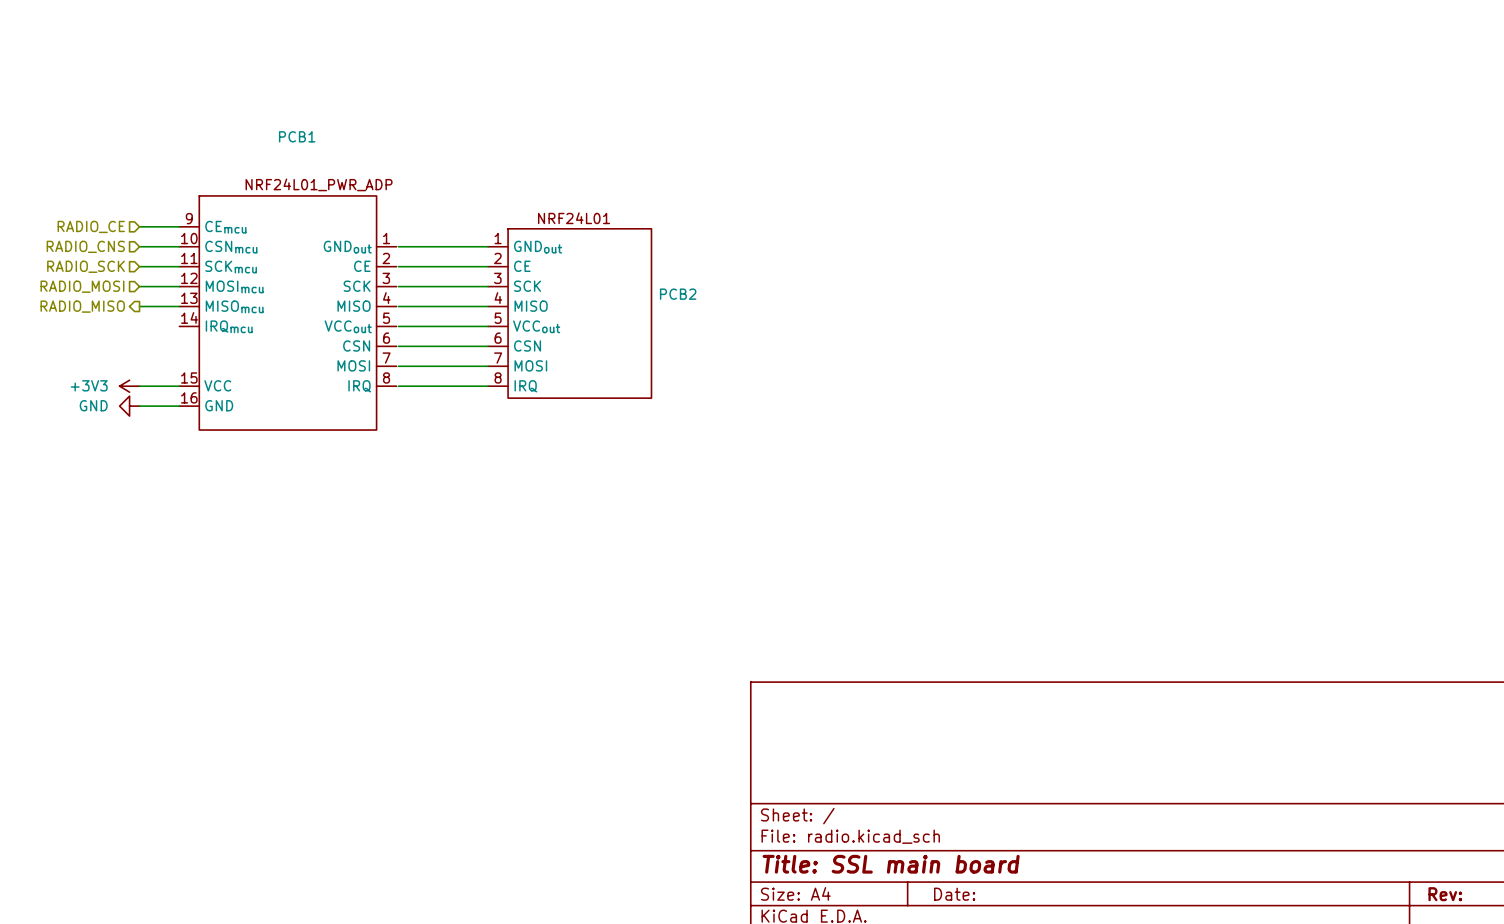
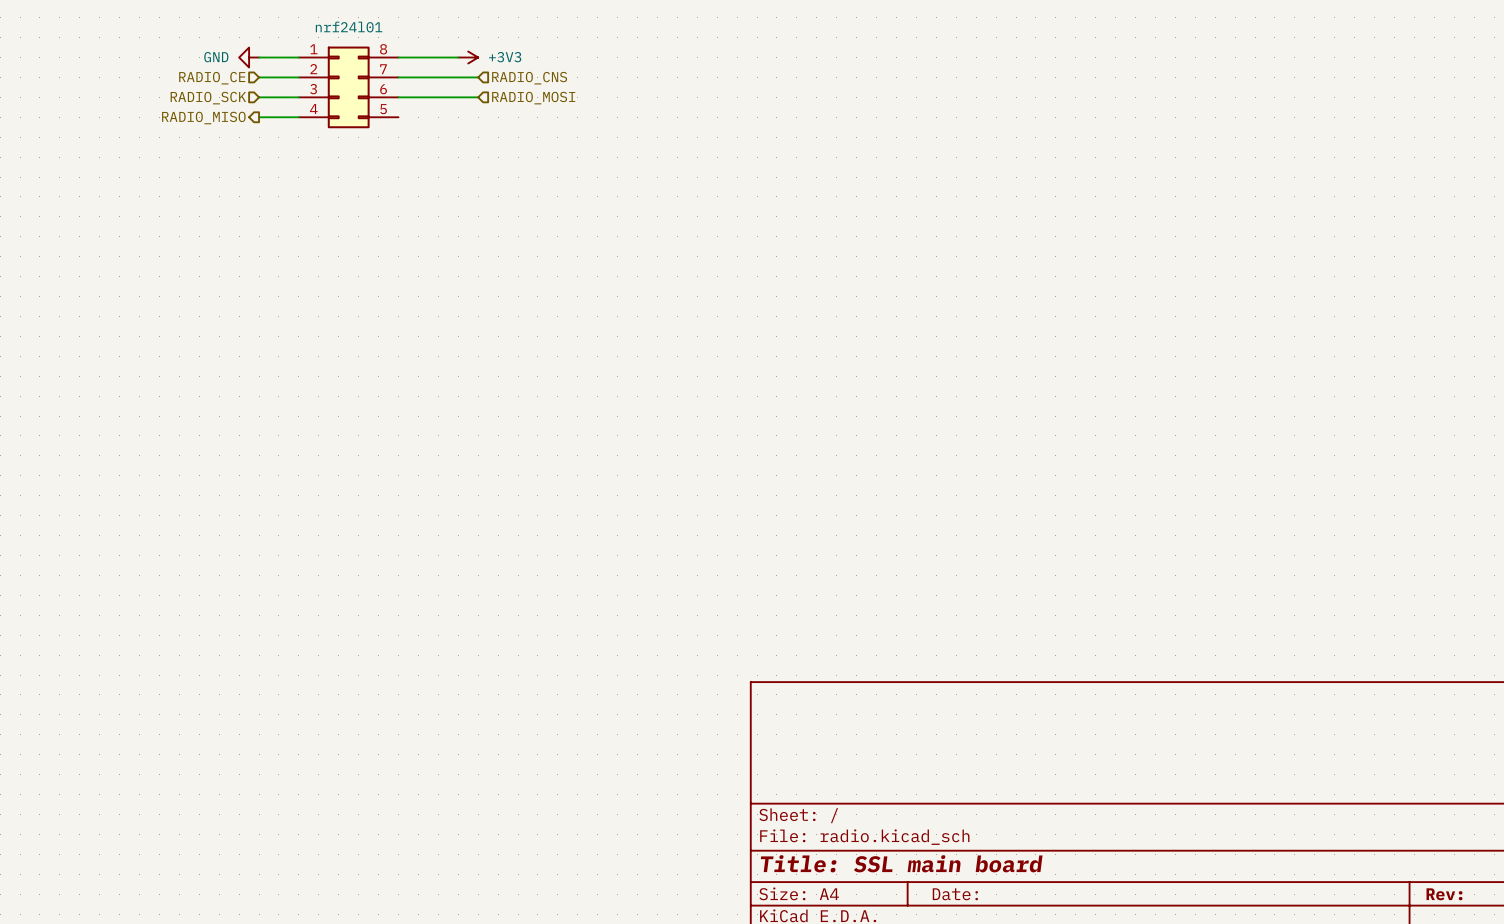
power symbol: none -> GND (249, 57)
wire: none -> (259, 57) (298, 57)
wire: none -> (398, 57) (458, 57)
power symbol: none -> +3V3 (468, 57)
wire: none -> (398, 77) (478, 77)
hierarchical label: none -> RADIO_CNS (529, 78)
part: none -> nrf24l01 (348, 87)
hierarchical label: none -> RADIO_SCK (208, 98)
wire: none -> (398, 97) (478, 97)
hierarchical label: none -> RADIO_MOSI (533, 98)
hierarchical label: none -> RADIO_MISO (203, 118)
hierarchical label position: RADIO_CE (91, 226) -> RADIO_CE (212, 78)
wire: (139, 226) (179, 226) -> (259, 77) (298, 77)
hierarchical label: RADIO_CNS (85, 246) -> none
wire: (139, 246) (179, 246) -> (259, 97) (298, 97)
wire: (398, 246) (488, 246) -> none
hierarchical label: RADIO_SCK (86, 266) -> none
wire: (139, 266) (179, 266) -> (259, 117) (298, 117)
wire: (398, 266) (488, 266) -> none
hierarchical label: RADIO_MOSI (82, 286) -> none
wire: (139, 286) (179, 286) -> none
wire: (398, 286) (488, 286) -> none
hierarchical label: RADIO_MISO (82, 306) -> none
wire: (139, 306) (179, 306) -> none
wire: (398, 306) (488, 306) -> none
PCB1: (287, 312) -> none
PCB2: (569, 313) -> none
wire: (398, 326) (488, 326) -> none
wire: (398, 346) (488, 346) -> none
wire: (398, 366) (488, 366) -> none
power symbol: +3V3 (129, 386) -> none
wire: (139, 386) (179, 386) -> none
wire: (398, 386) (488, 386) -> none
power symbol: GND (129, 406) -> none
wire: (139, 406) (179, 406) -> none

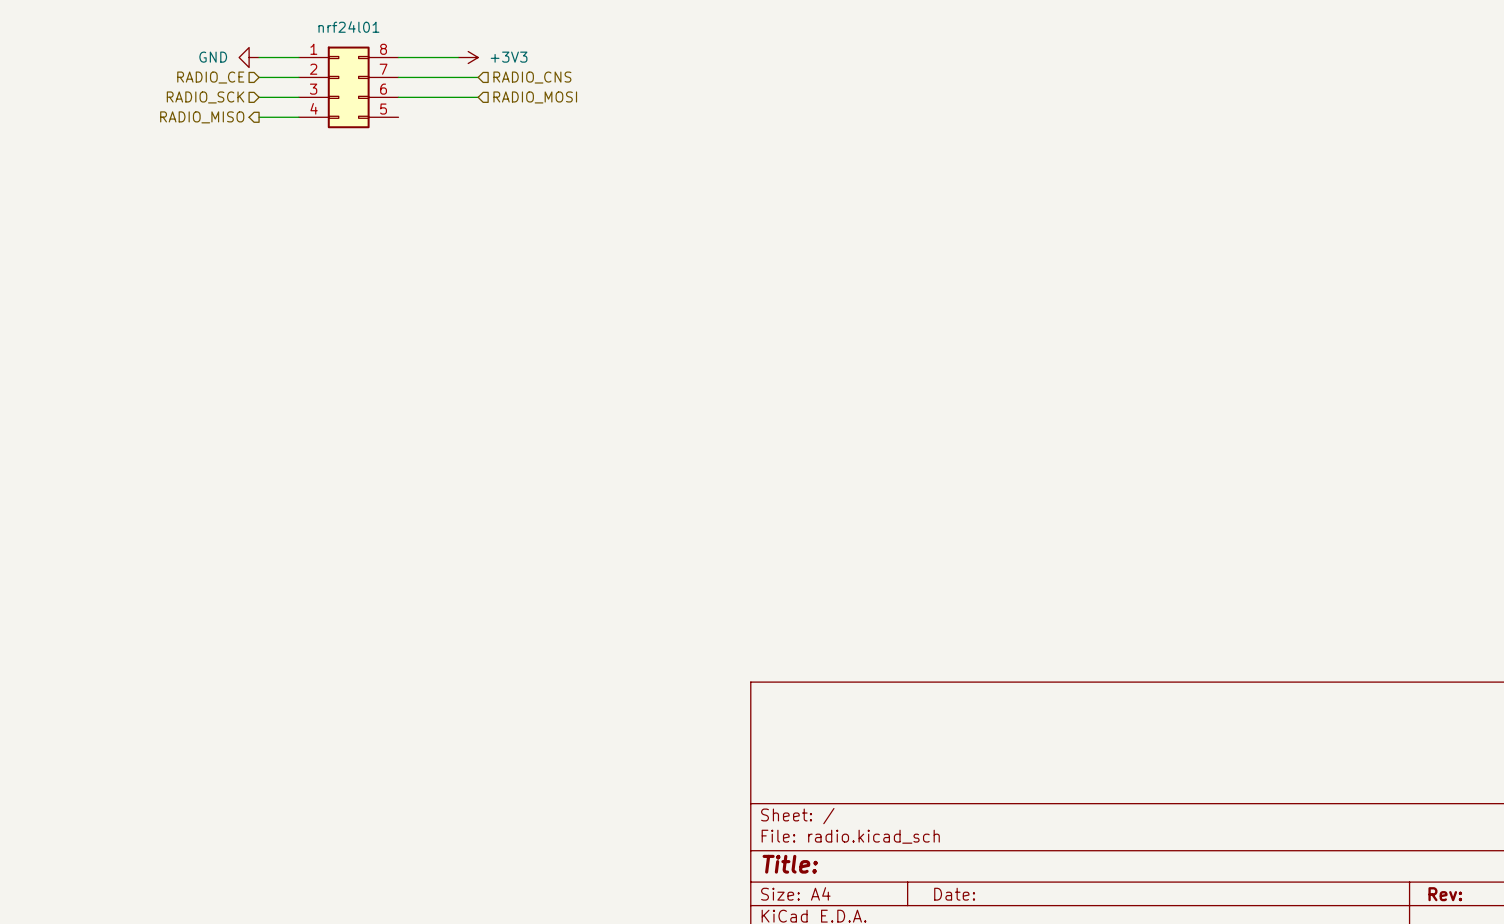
title block: Title: SSL main board (901, 863) -> Title: (790, 864)

